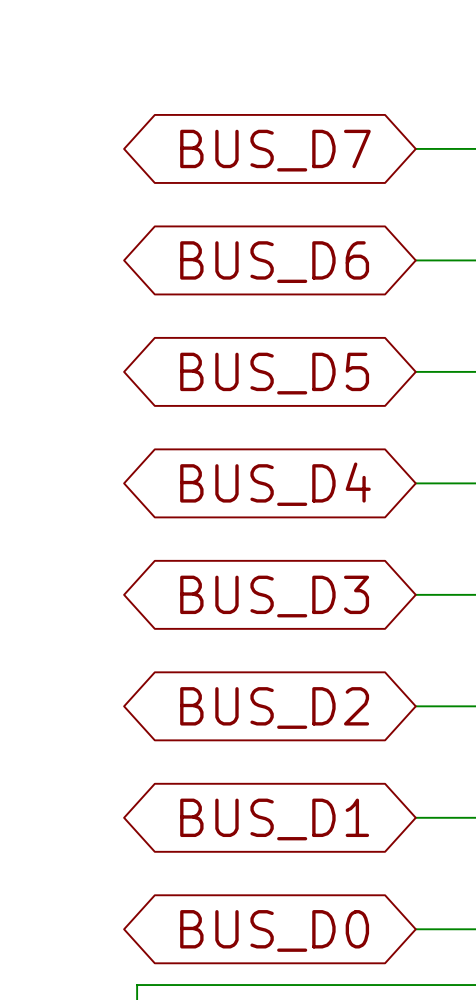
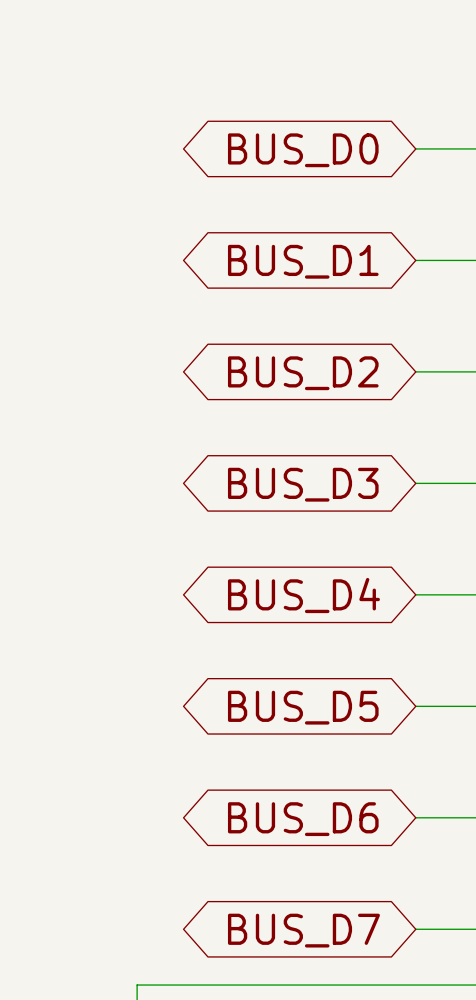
global label: BUS_D7 (275, 150) -> BUS_D0 (303, 150)
global label: BUS_D6 (274, 262) -> BUS_D1 (303, 261)
global label: BUS_D5 (274, 373) -> BUS_D2 (303, 373)
global label: BUS_D4 (275, 484) -> BUS_D3 (303, 484)
global label: BUS_D3 (274, 596) -> BUS_D4 (303, 595)
global label: BUS_D2 (274, 708) -> BUS_D5 (303, 707)
global label: BUS_D1 (274, 819) -> BUS_D6 (303, 819)
global label: BUS_D0 (274, 930) -> BUS_D7 (303, 930)

